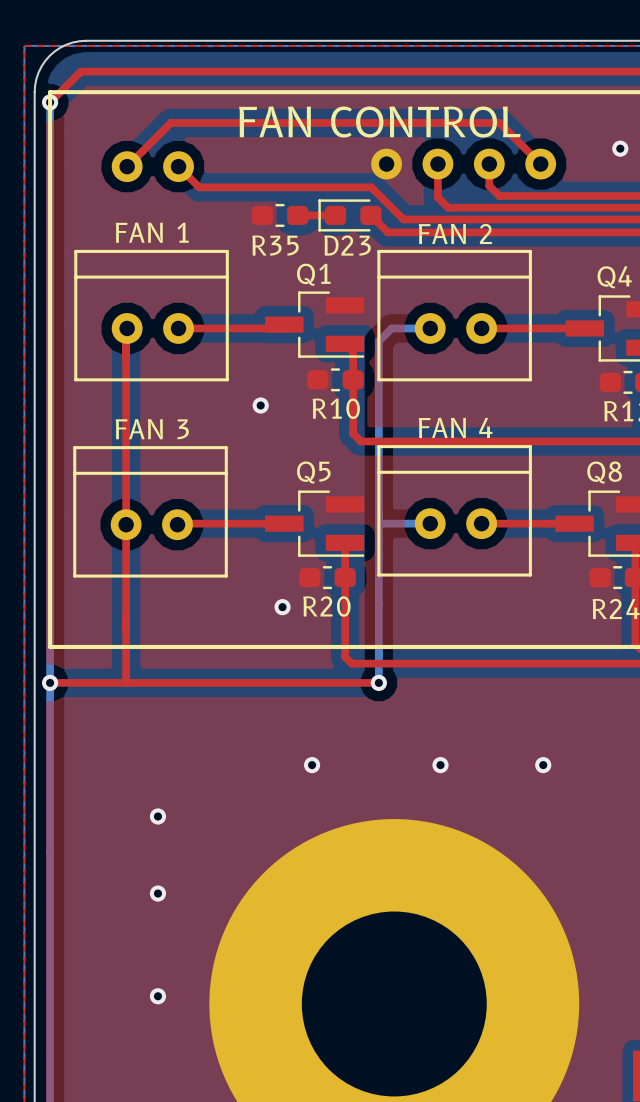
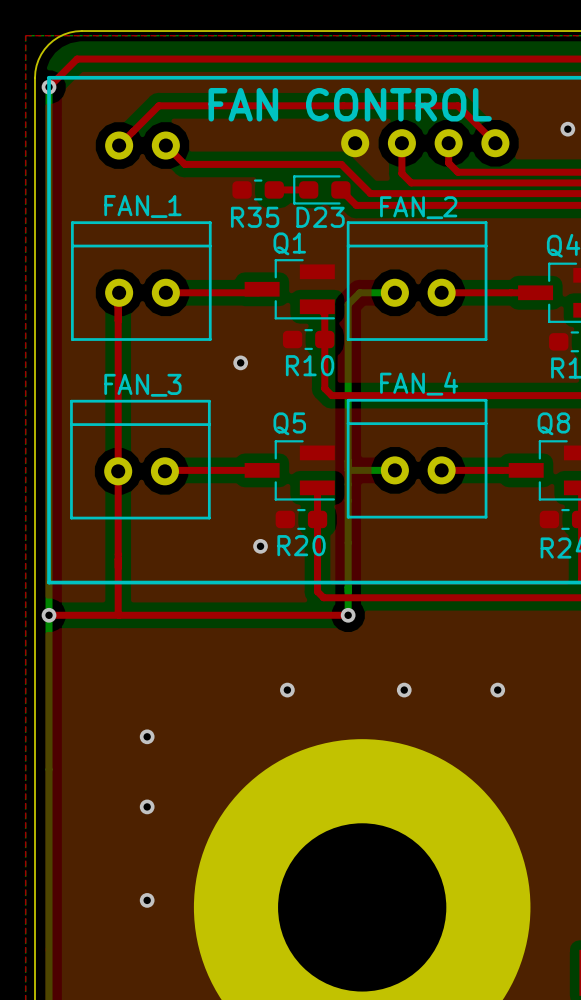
part value: FAN 1 (152, 232) -> FAN_1 (142, 206)
part value: FAN 2 (455, 233) -> FAN_2 (418, 207)
part value: FAN 4 (455, 427) -> FAN_4 (419, 383)
part value: FAN 3 (152, 429) -> FAN_3 (142, 385)

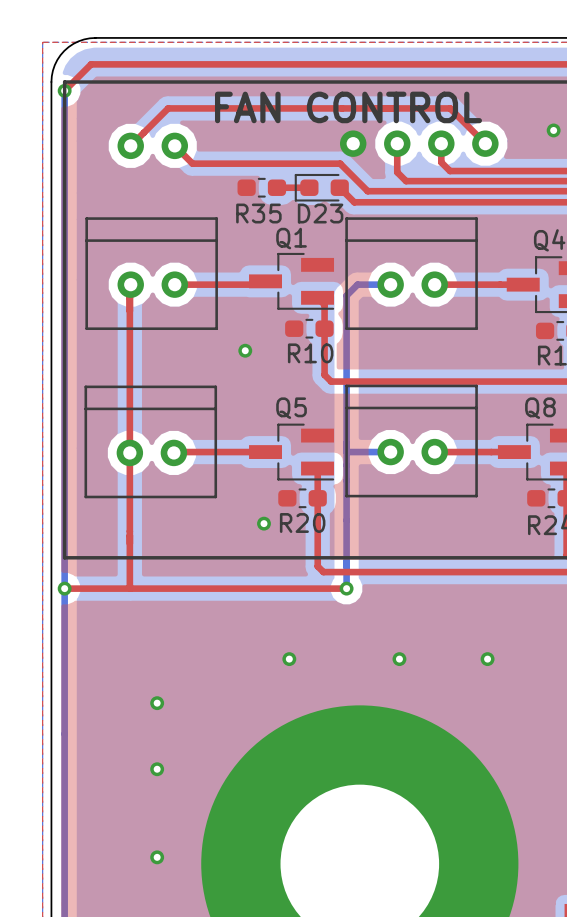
part value: FAN_1 (142, 206) -> none
part value: FAN_2 (418, 207) -> none
part value: FAN_4 (419, 383) -> none
part value: FAN_3 (142, 385) -> none

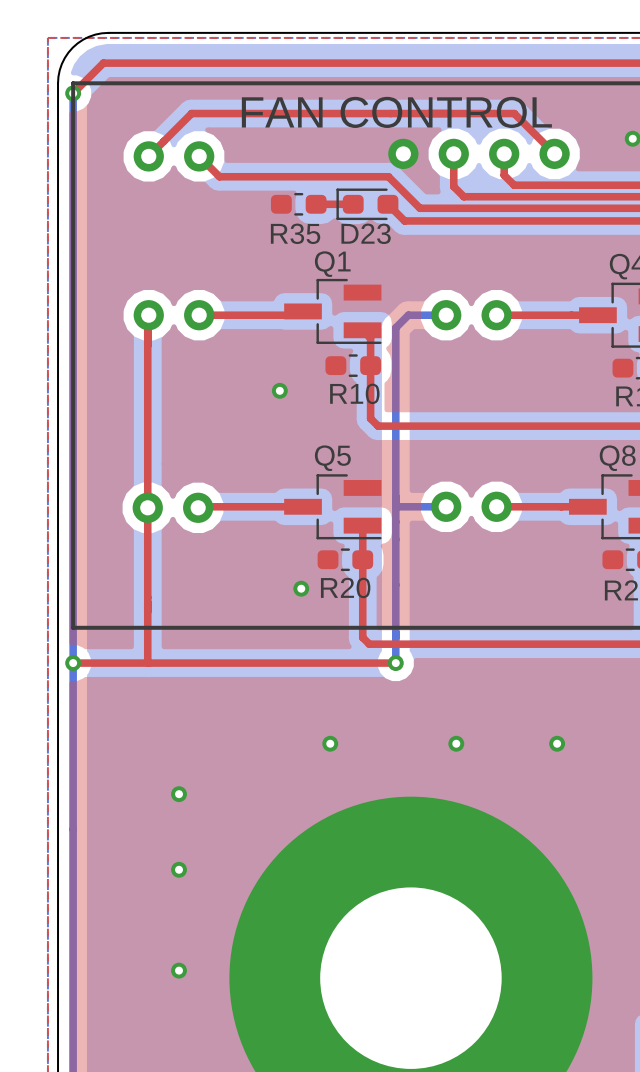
part side: top (151, 273) -> bottom (173, 315)
part side: top (411, 273) -> bottom (471, 315)
part side: top (150, 441) -> bottom (172, 507)
part side: top (411, 441) -> bottom (471, 506)

